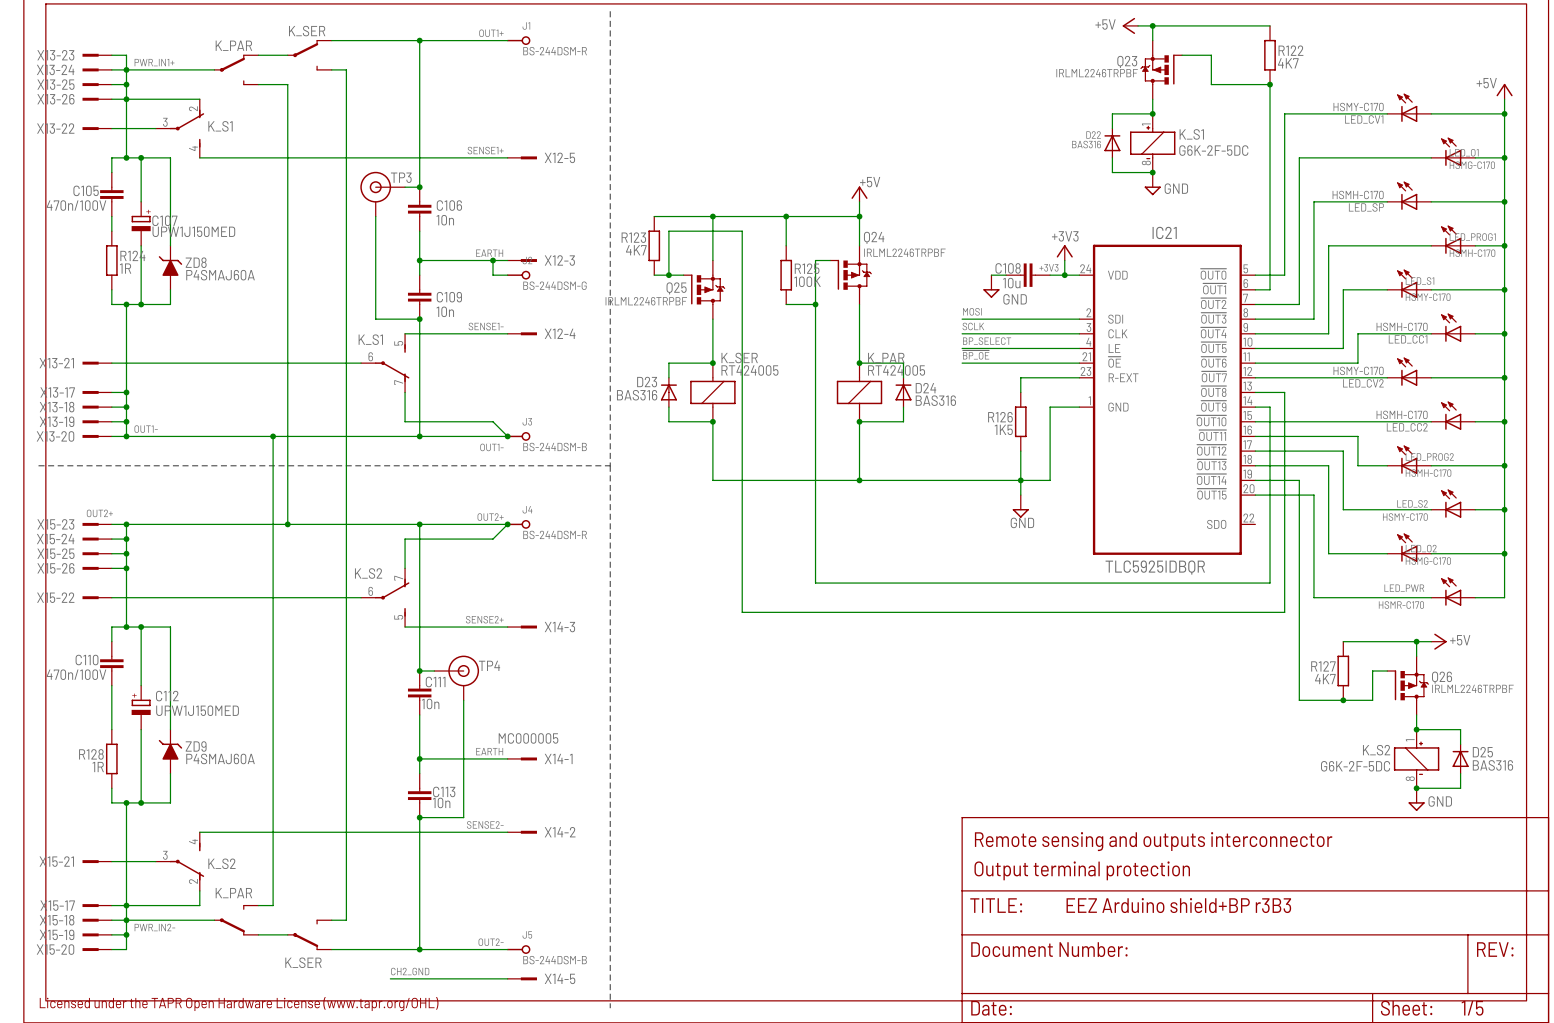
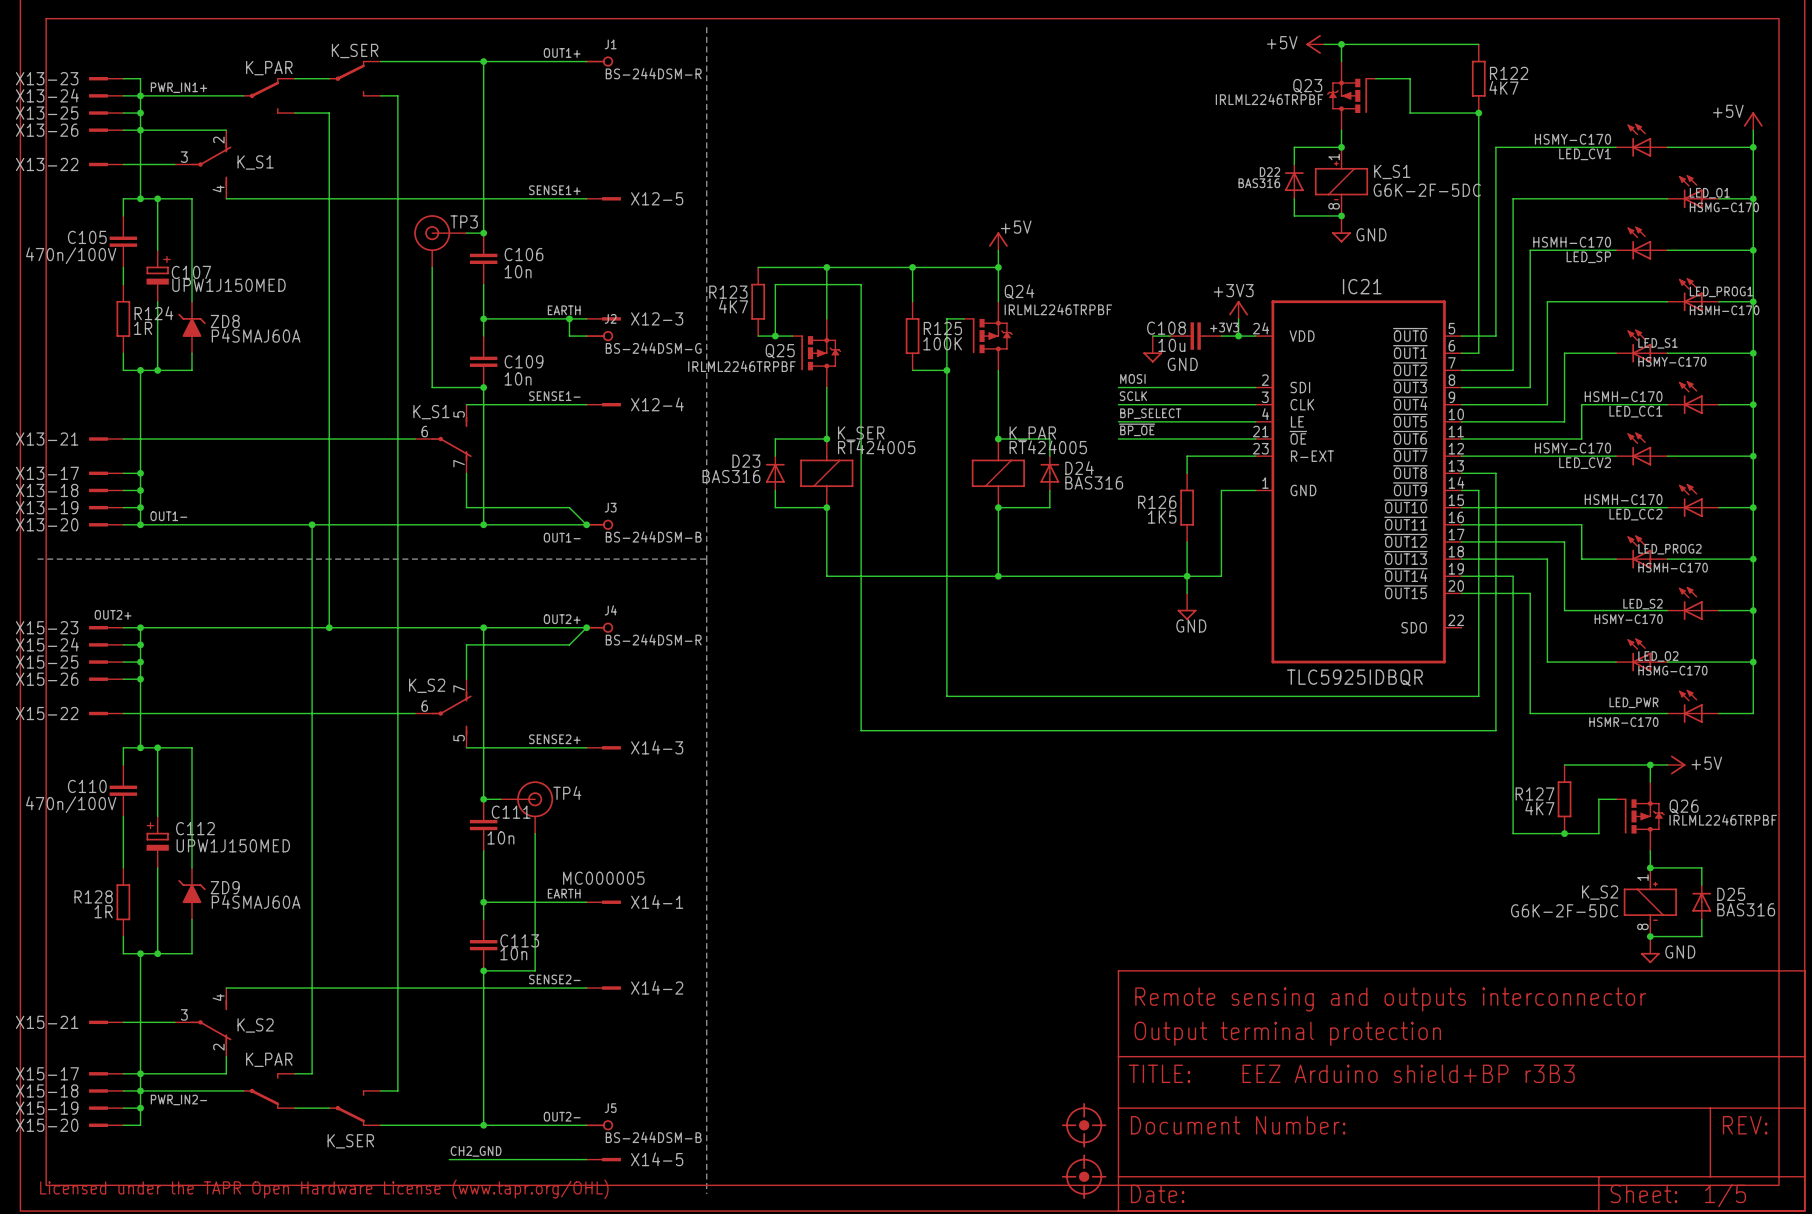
part: none -> (1084, 1125)
part: none -> (1084, 1176)

